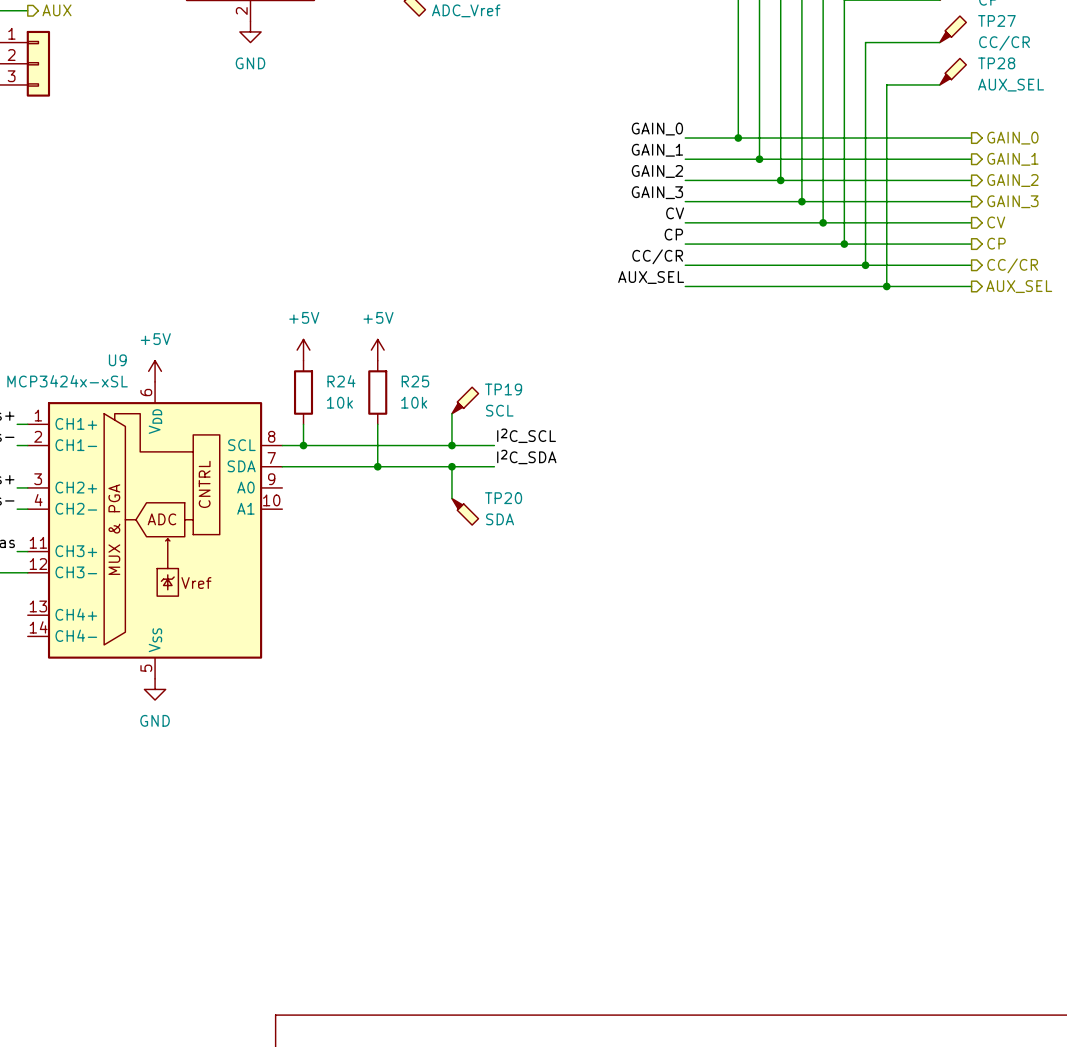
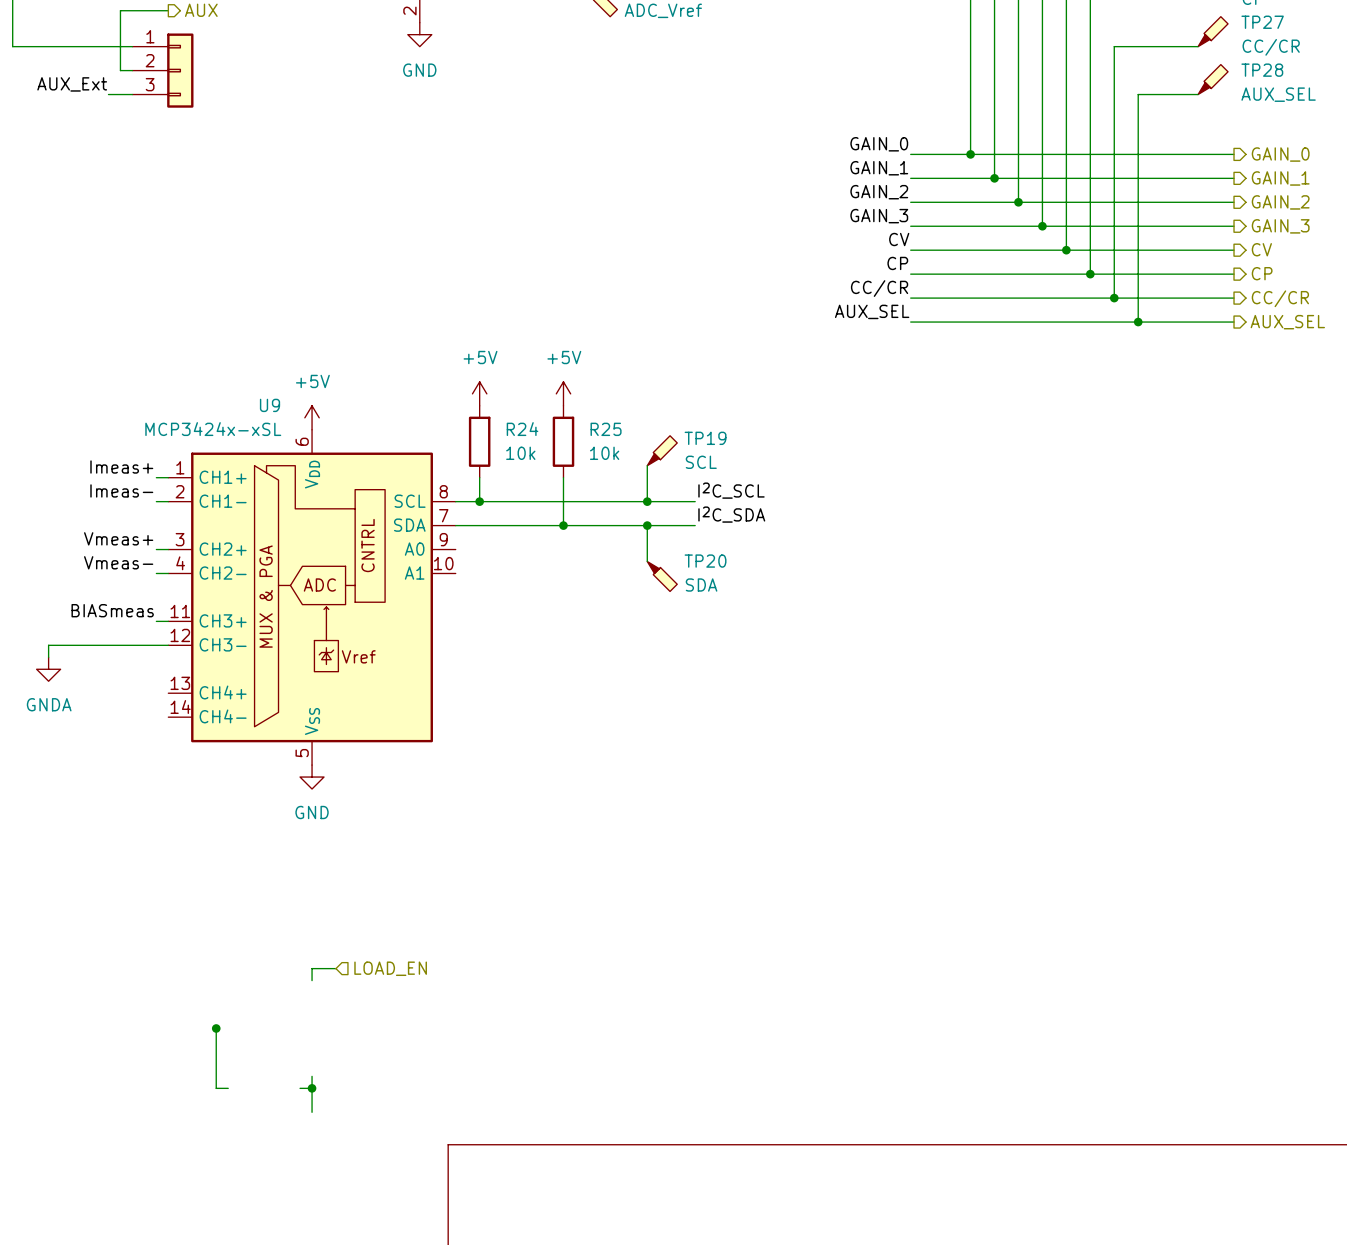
wire: none -> (335, 968) (312, 968) (312, 980)
hierarchical label: none -> LOAD_EN (390, 968)
wire: none -> (216, 1028) (216, 1088) (228, 1088)
junction: none -> (216, 1028)
wire: none -> (312, 1076) (312, 1112)
wire: none -> (300, 1088) (312, 1088)
junction: none -> (312, 1088)

